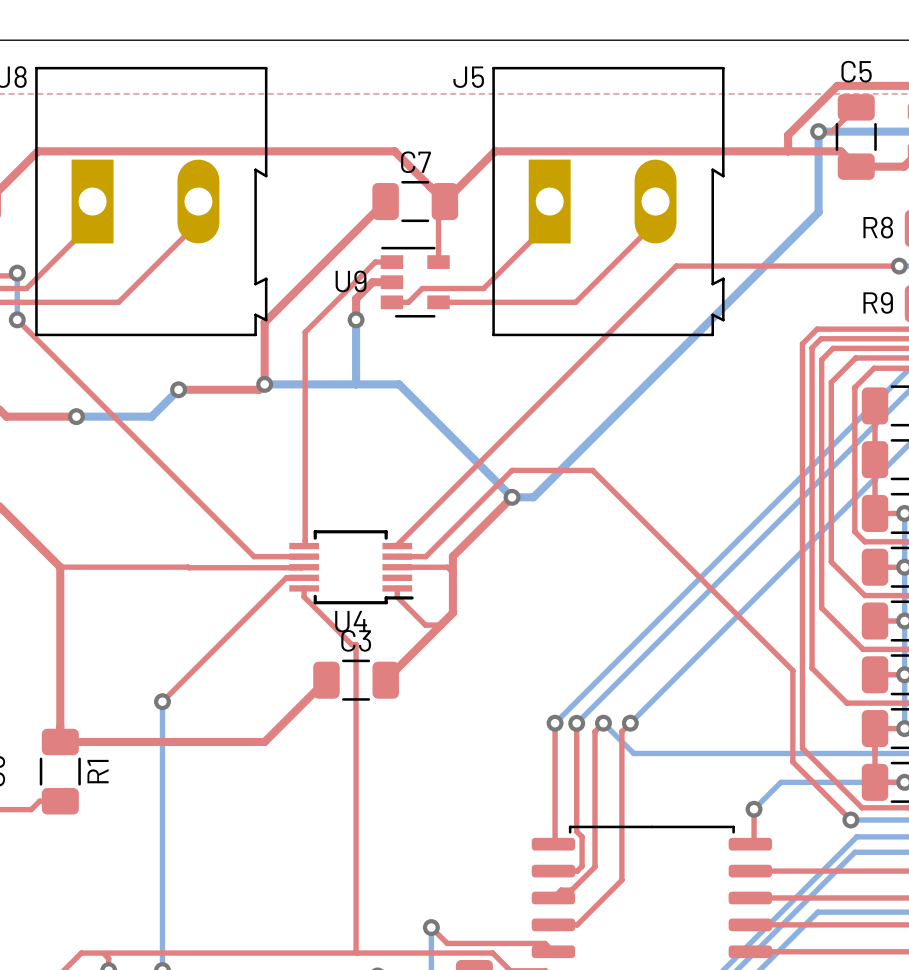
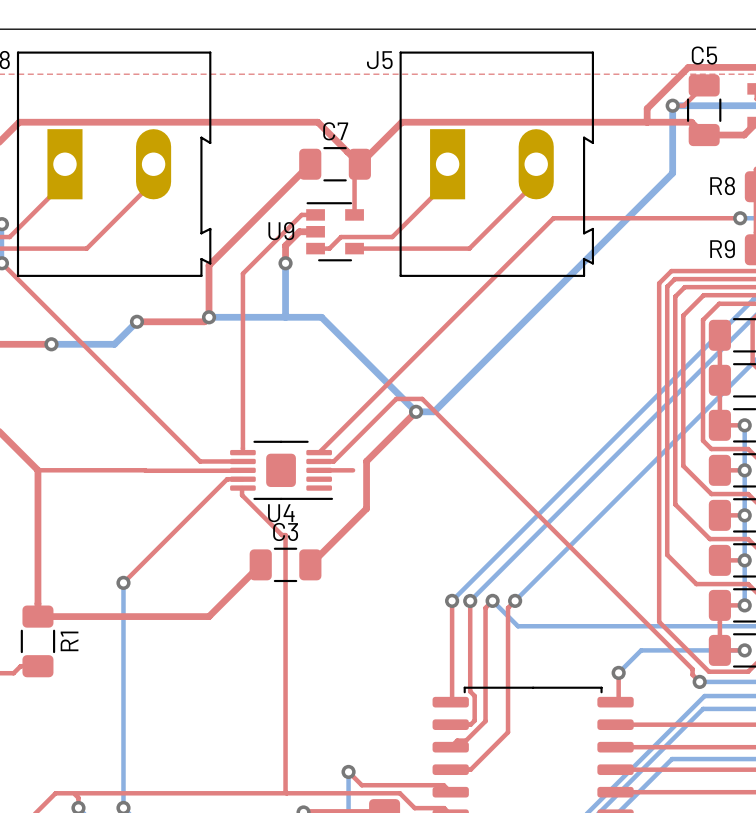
U4 footprint: [289, 530, 414, 605] -> [230, 440, 334, 500]
top track: (413, 556) (425, 556) (512, 470) (592, 470) (792, 670) (792, 761) (842, 811) -> (333, 461) (396, 398) (422, 398) (692, 669) (692, 674)
top track: (436, 567) (447, 567) (452, 572) -> none
top track: (397, 588) (397, 596) (425, 625) (440, 625) -> none

